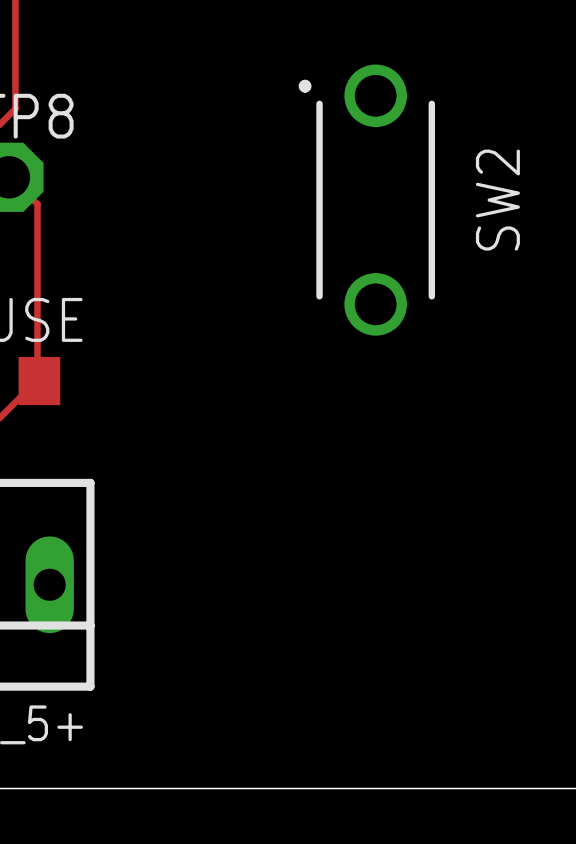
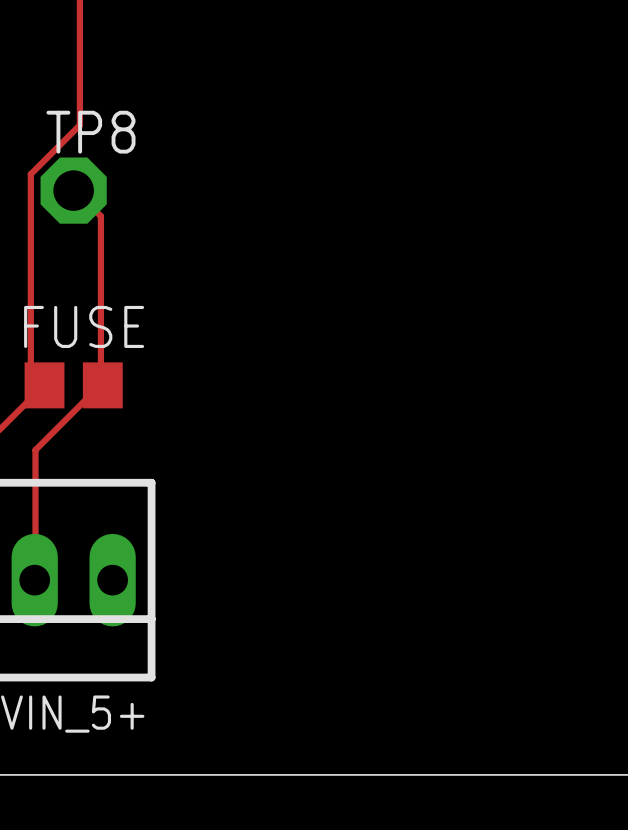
SW2: (366, 200) -> none

